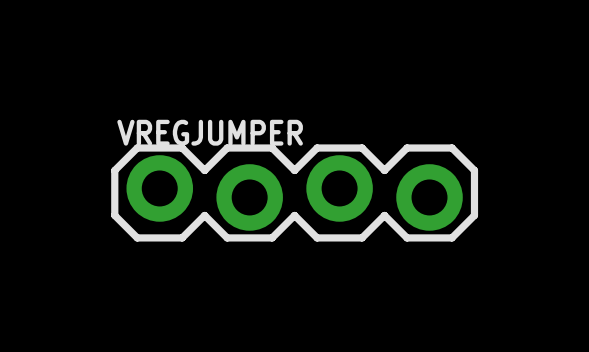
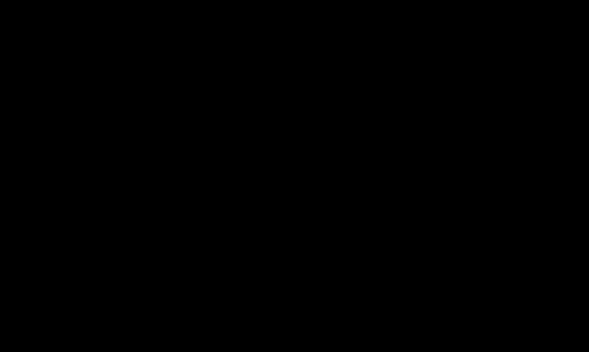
VREGJUMPER: (294, 192) -> none

